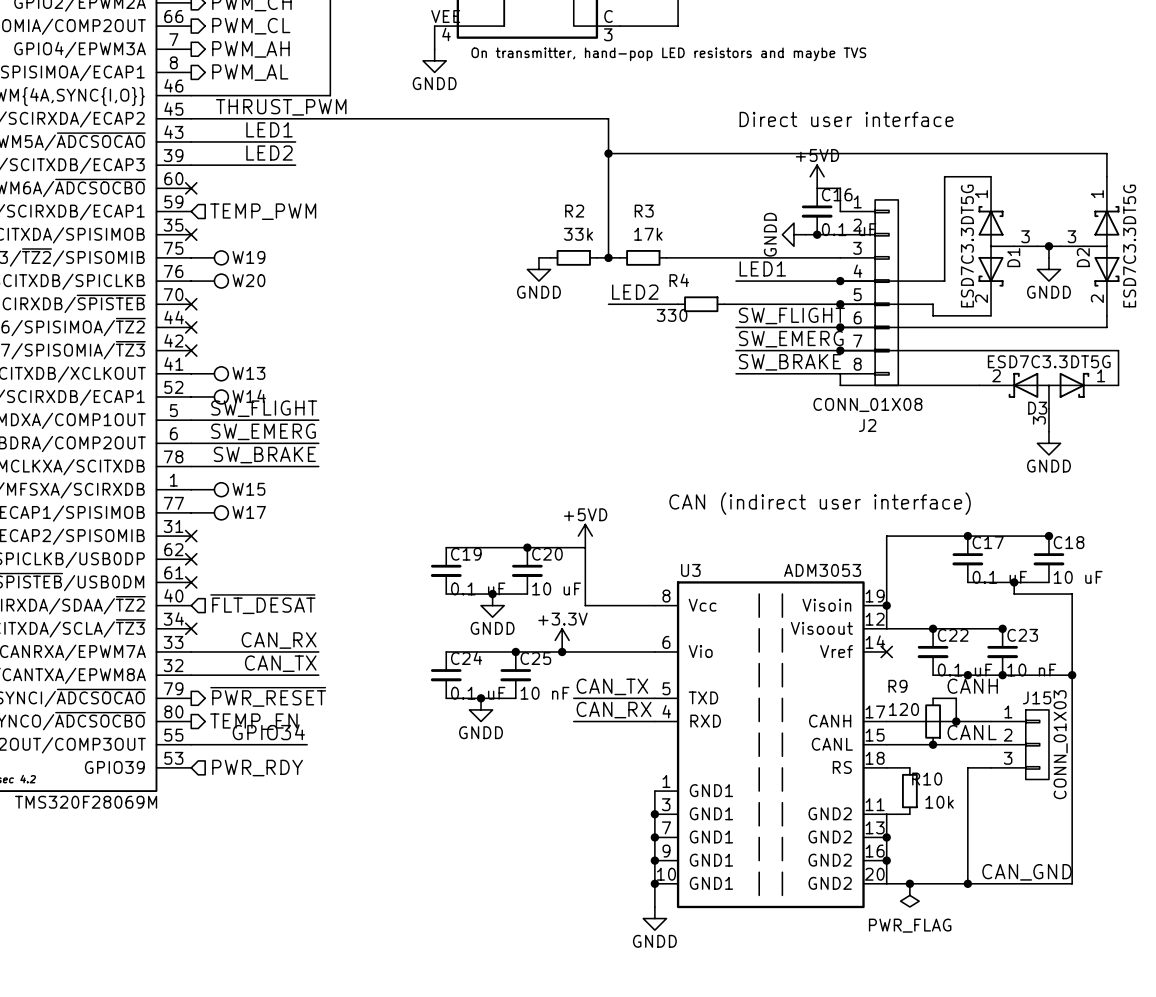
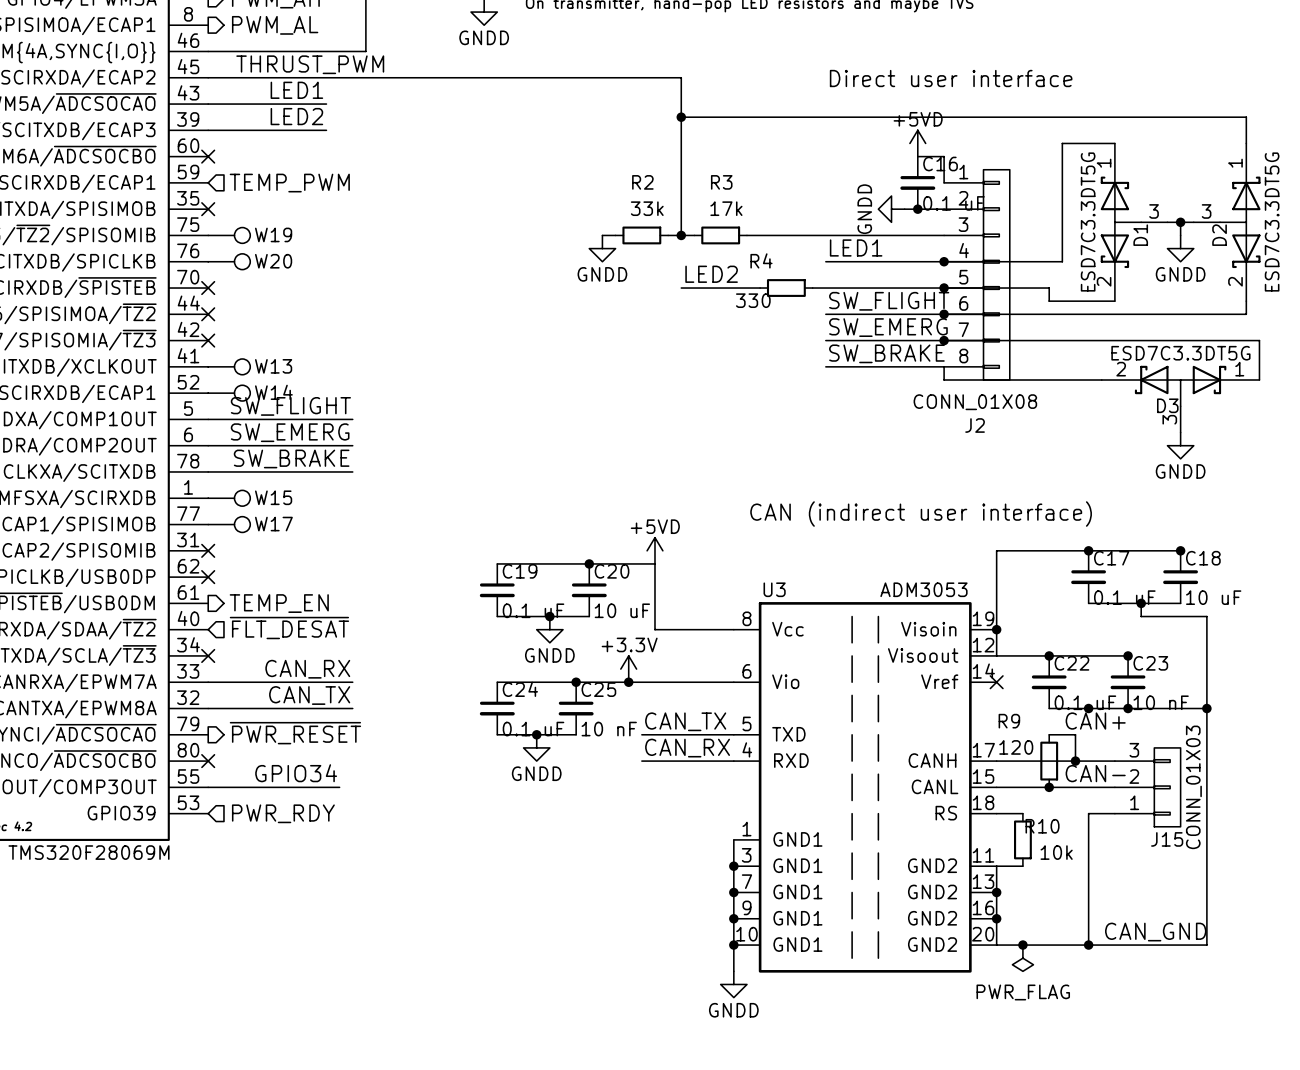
no-connect mark: (191, 582) -> none
label: CANH (972, 686) -> CAN+ (1095, 721)
no-connect mark: none -> (208, 761)
hierarchical label position: TEMP_EN (253, 721) -> TEMP_EN (279, 603)
label: CANL (972, 732) -> CAN- (1095, 773)
J15 flip: as is (1037, 744) -> up-down (1167, 787)

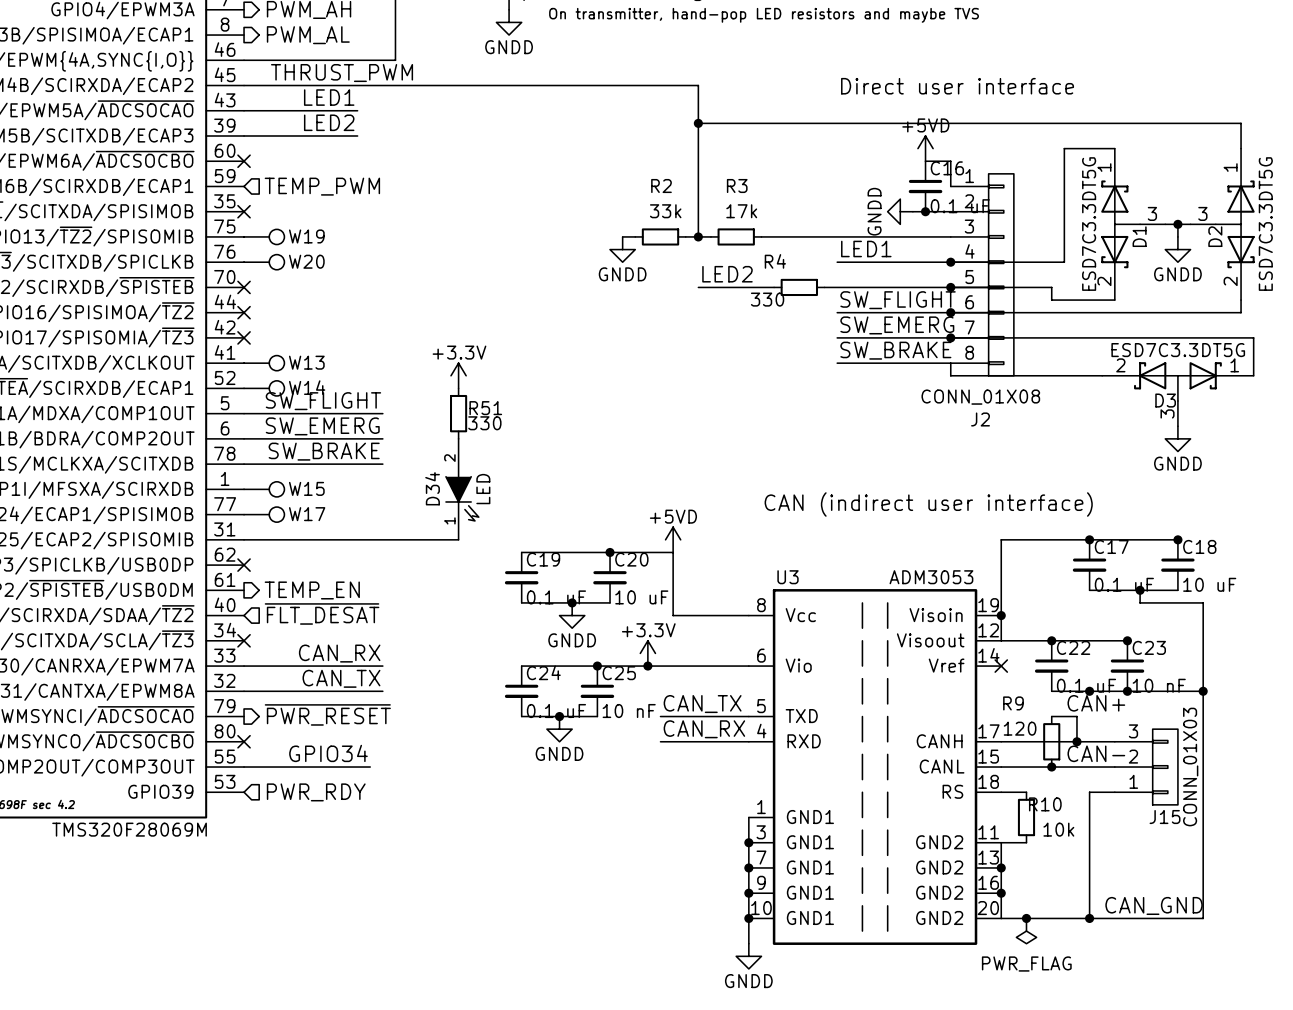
power symbol: none -> +3.3V (458, 375)
R51: none -> 330 (458, 413)
D34: none -> LED (462, 489)
wire: none -> (244, 539) (458, 539)
no-connect mark: (208, 550) -> none

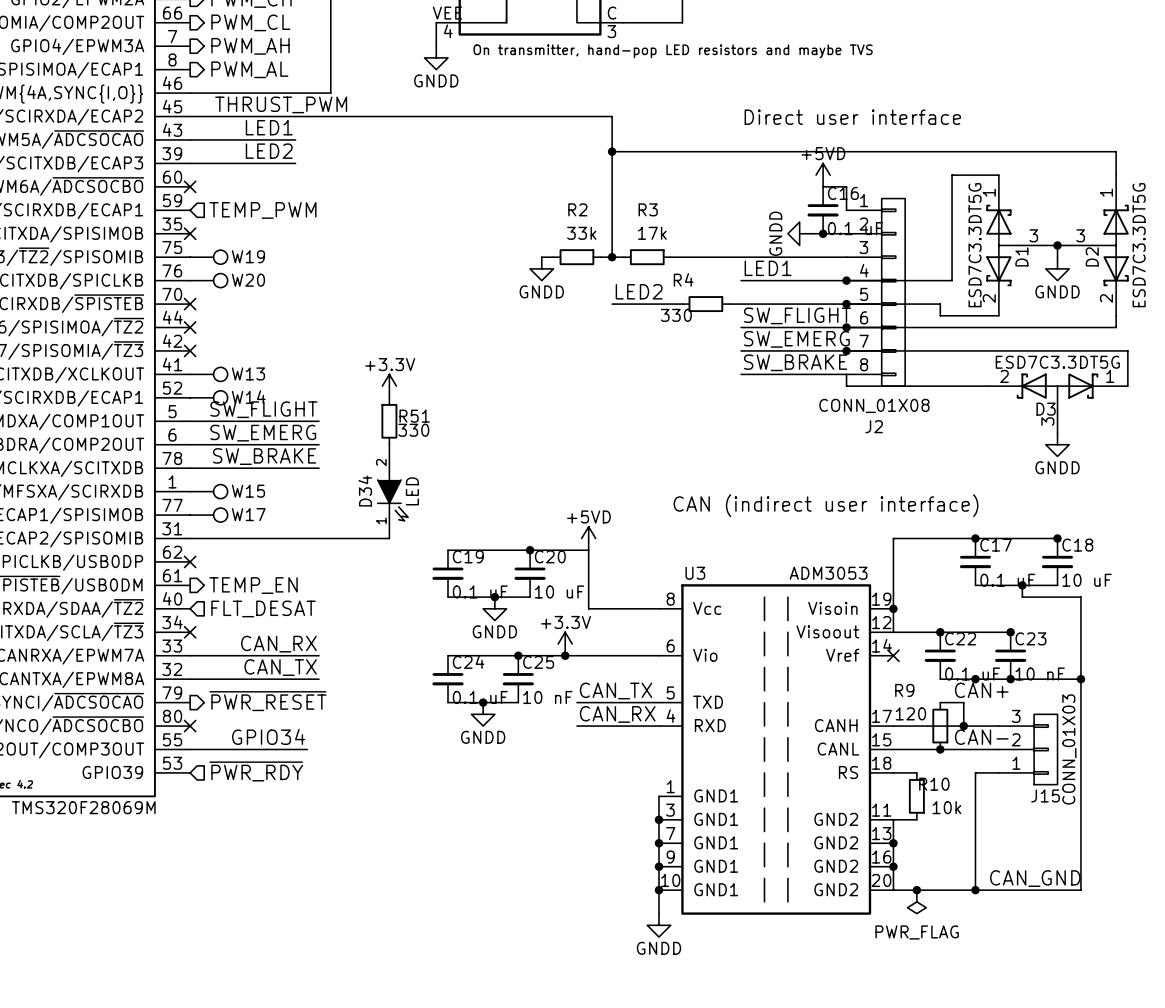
hierarchical label: ~{FLT_DESAT} (322, 613) -> FLT_DESAT (263, 608)
hierarchical label: PWR_RDY (316, 792) -> ~{PWR_RDY} (256, 771)

